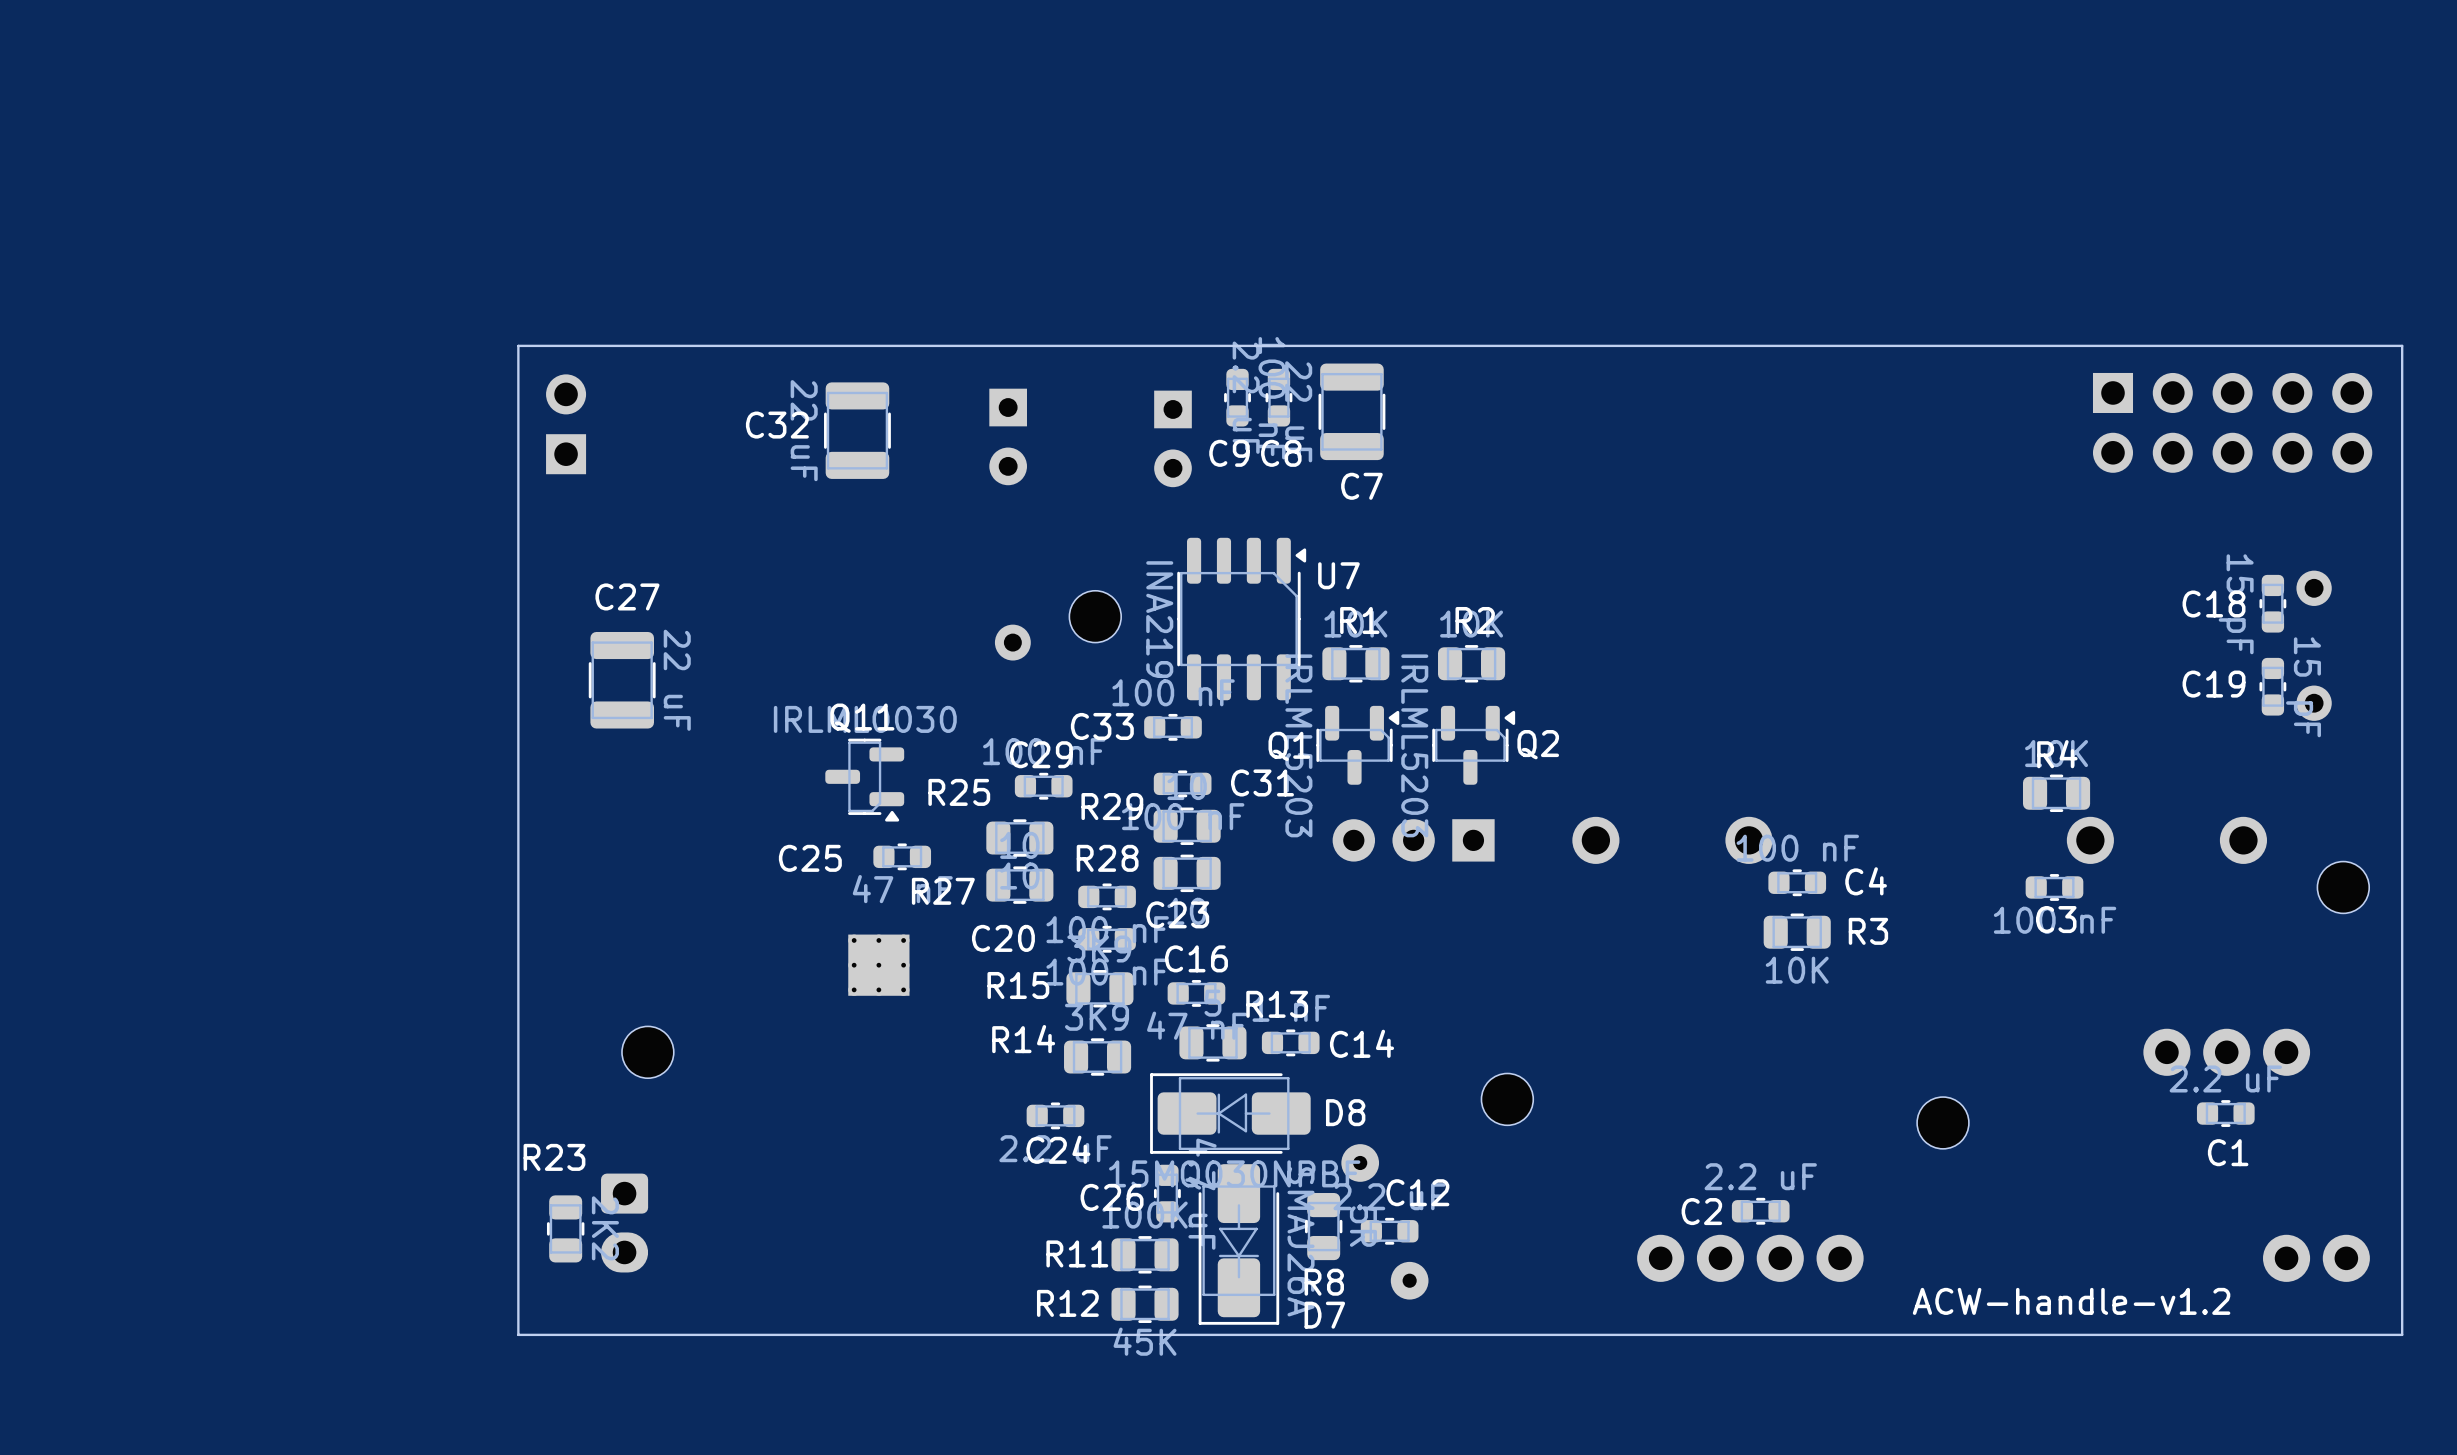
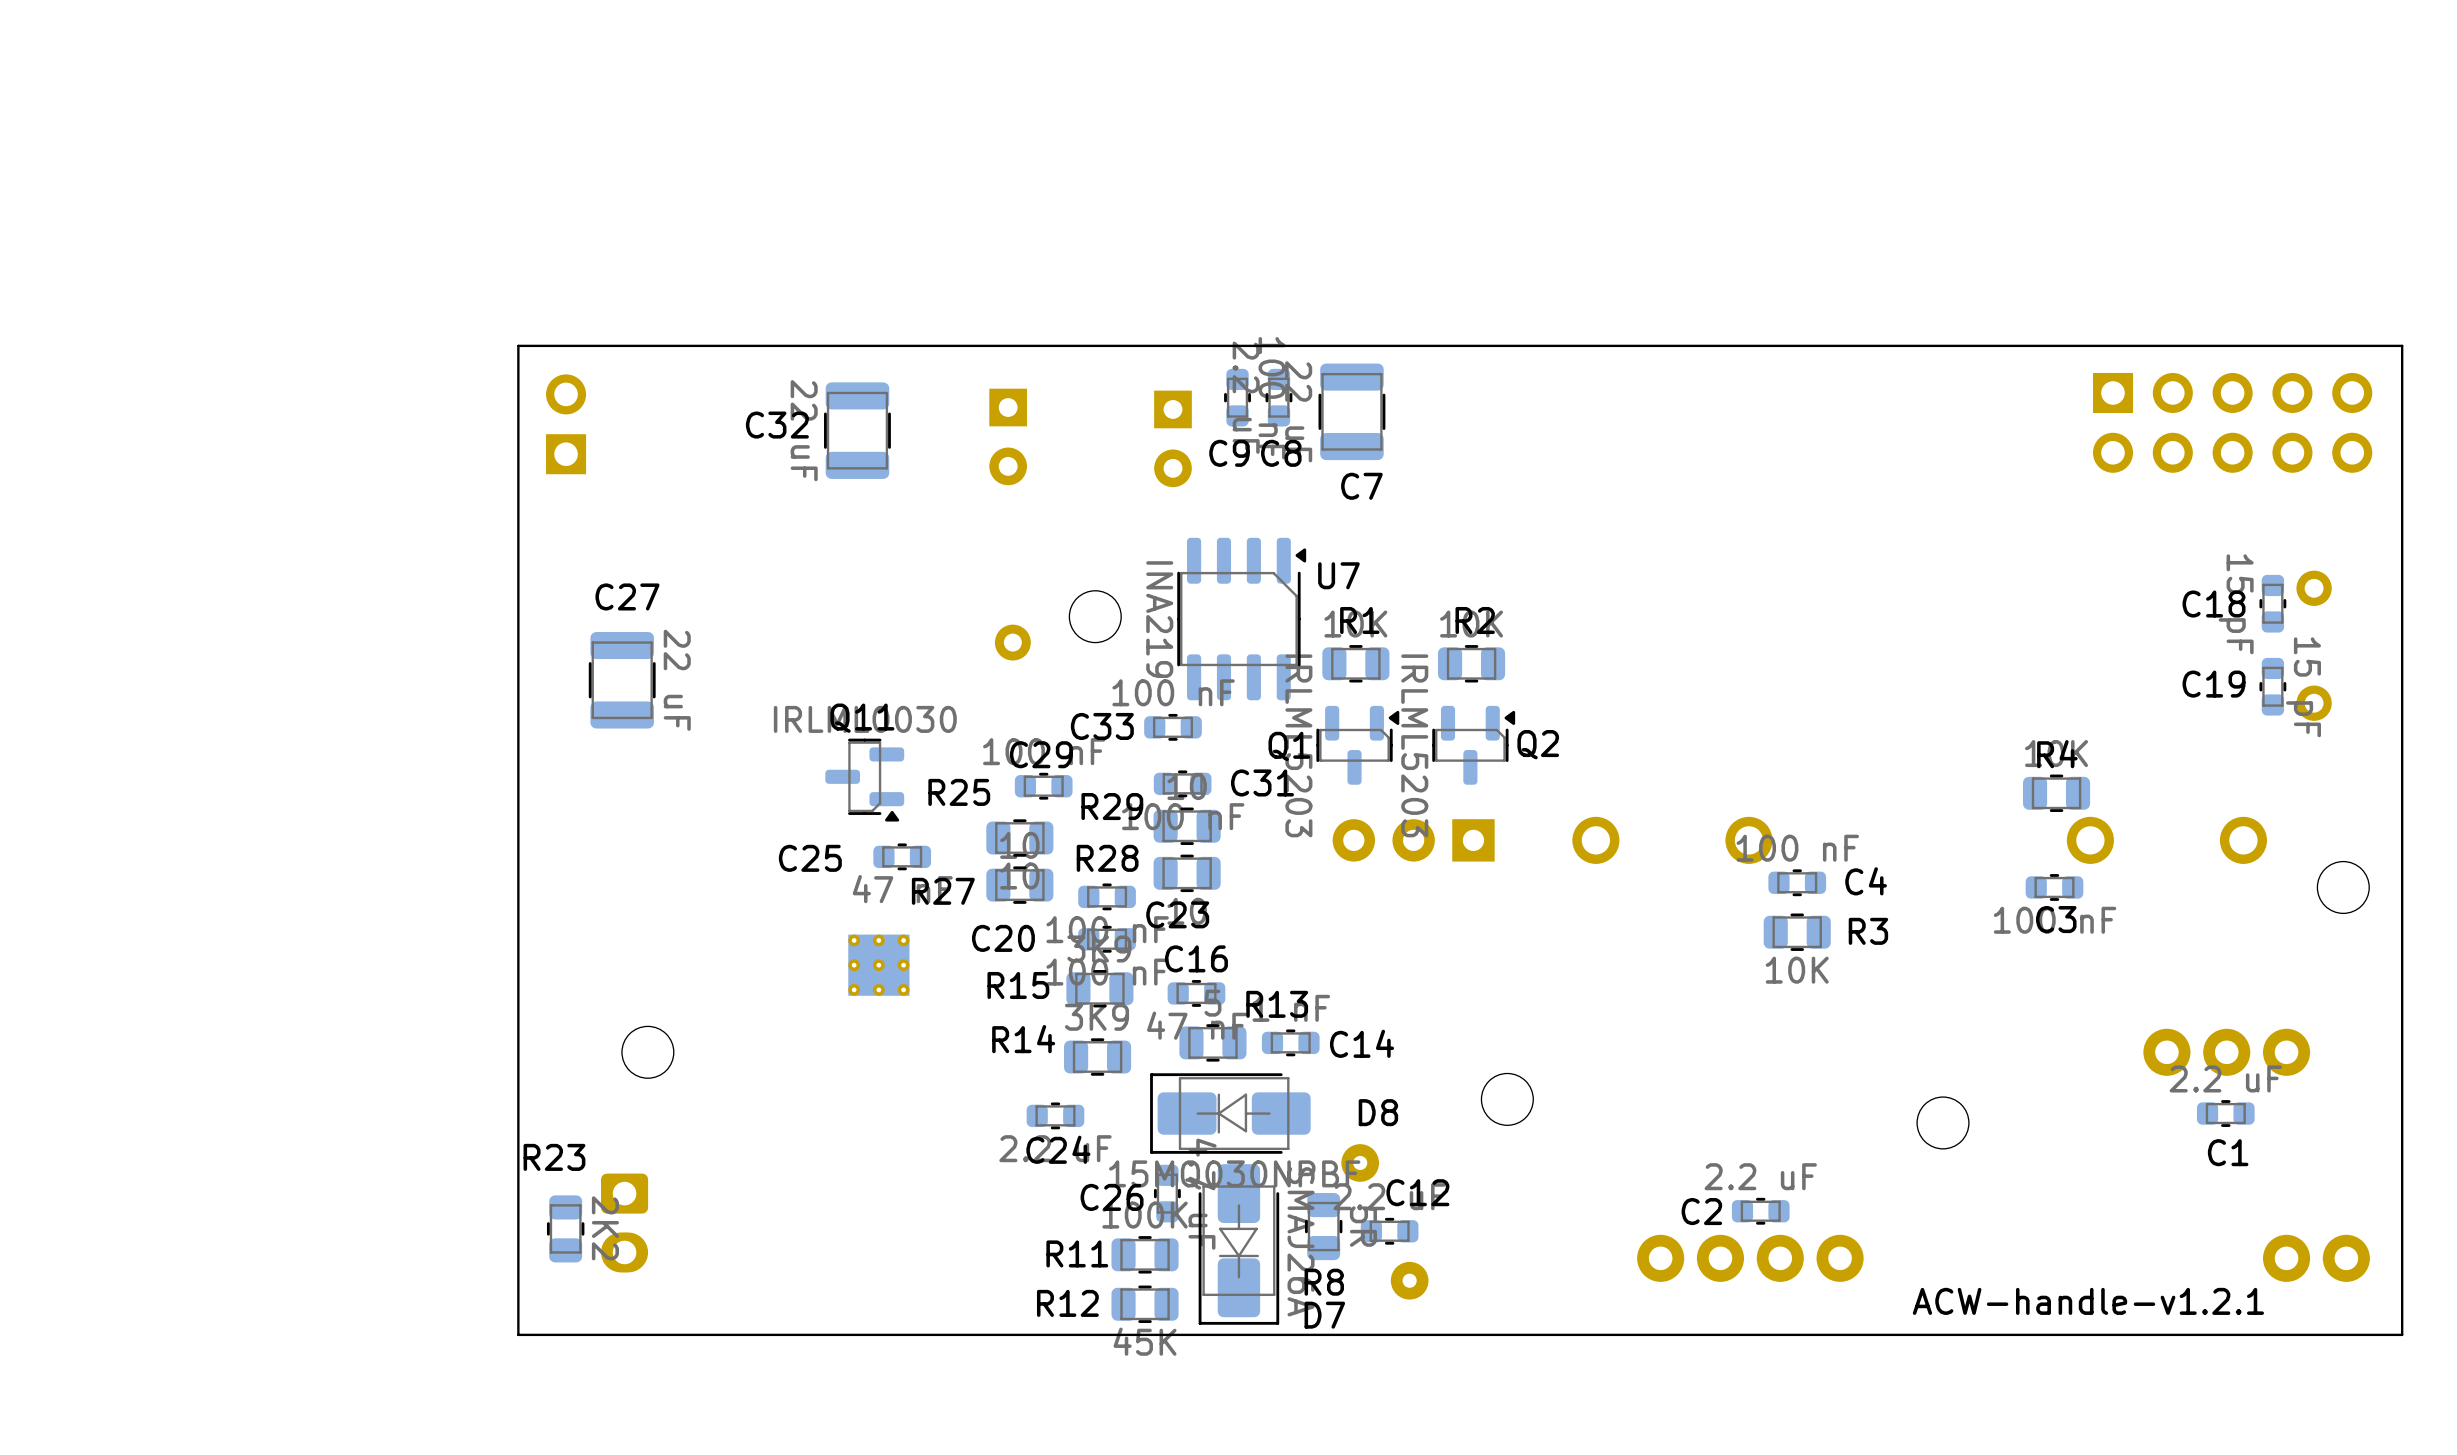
D8 name position: D8 (1345, 1112) -> D8 (1378, 1112)
text: ACW-handle-v1.2 (2071, 1301) -> ACW-handle-v1.2.1 (2088, 1301)

